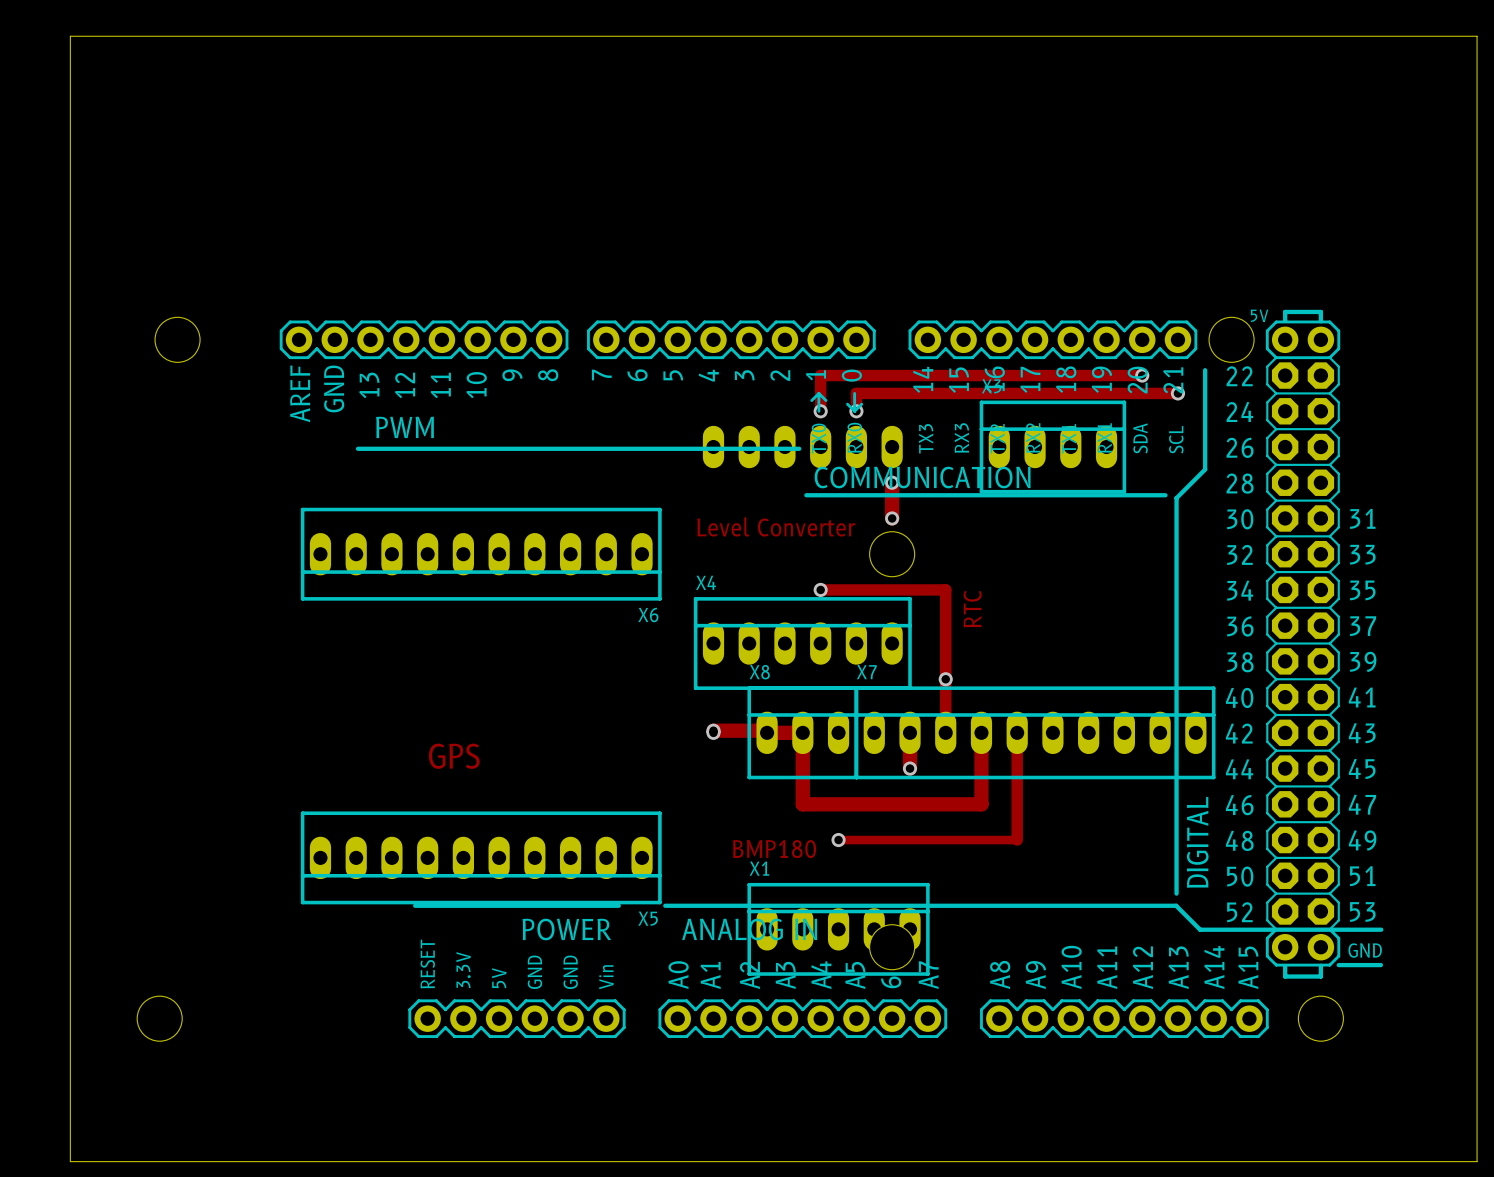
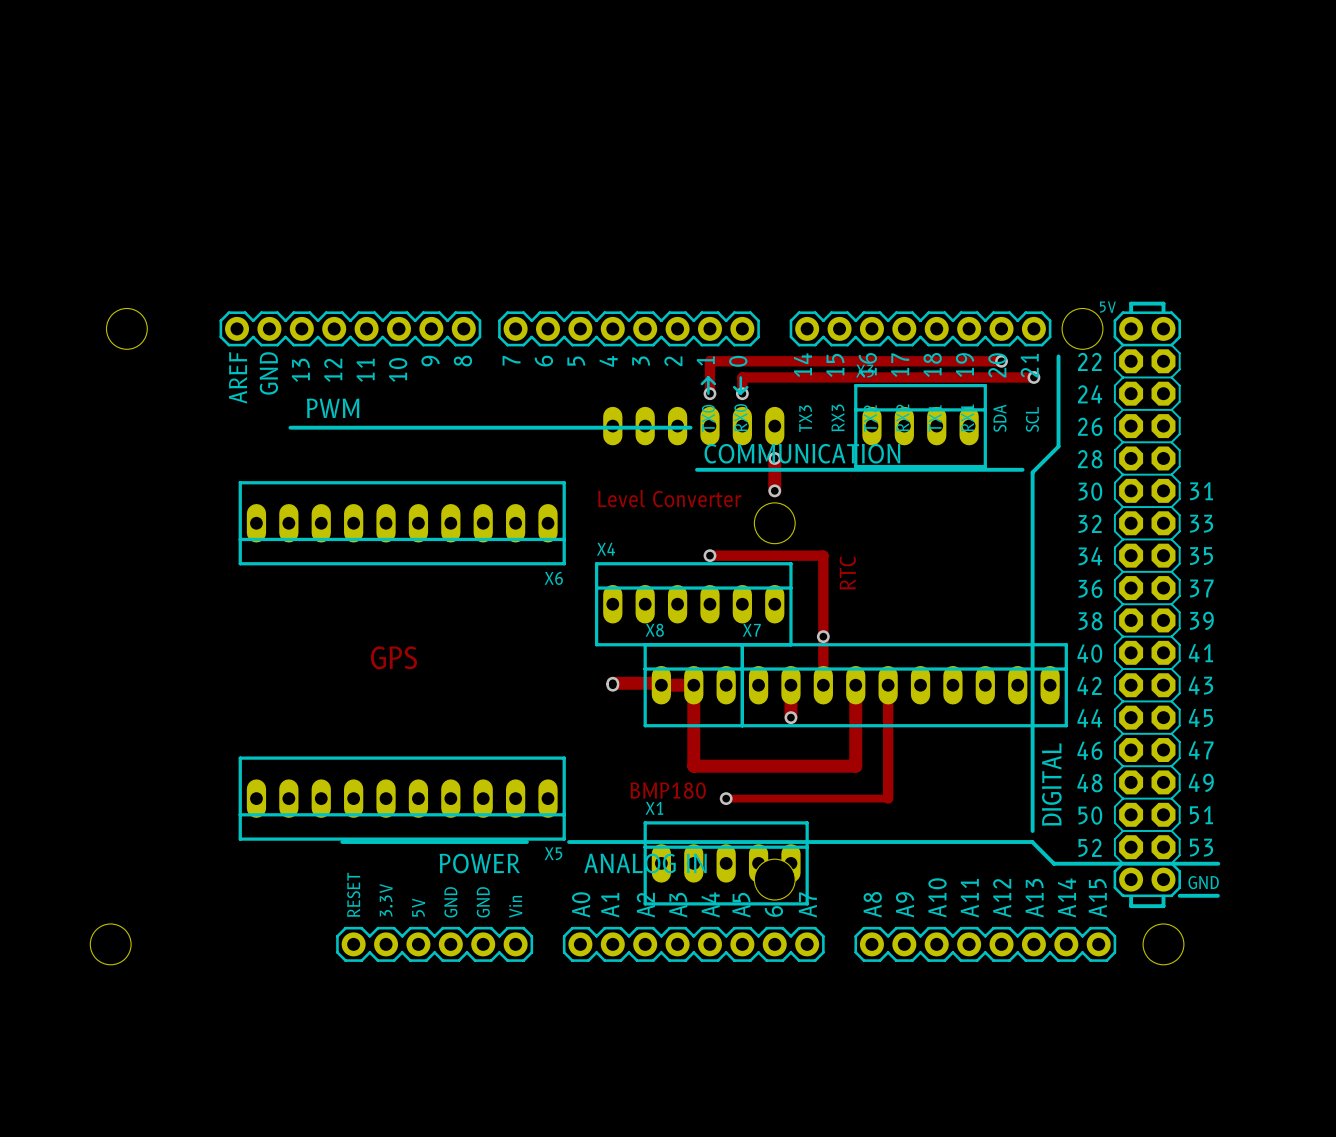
board edge: (70, 36) (1477, 36) (1477, 1161) (70, 1161) (70, 36) -> none
text position: GPS (454, 756) -> GPS (393, 657)
track: (802, 804) (981, 804) -> (693, 750) (693, 766) (855, 766) (855, 750)
track: (838, 840) (1017, 840) -> (726, 798) (888, 798) (888, 782)
via position: (838, 840) -> (726, 798)

